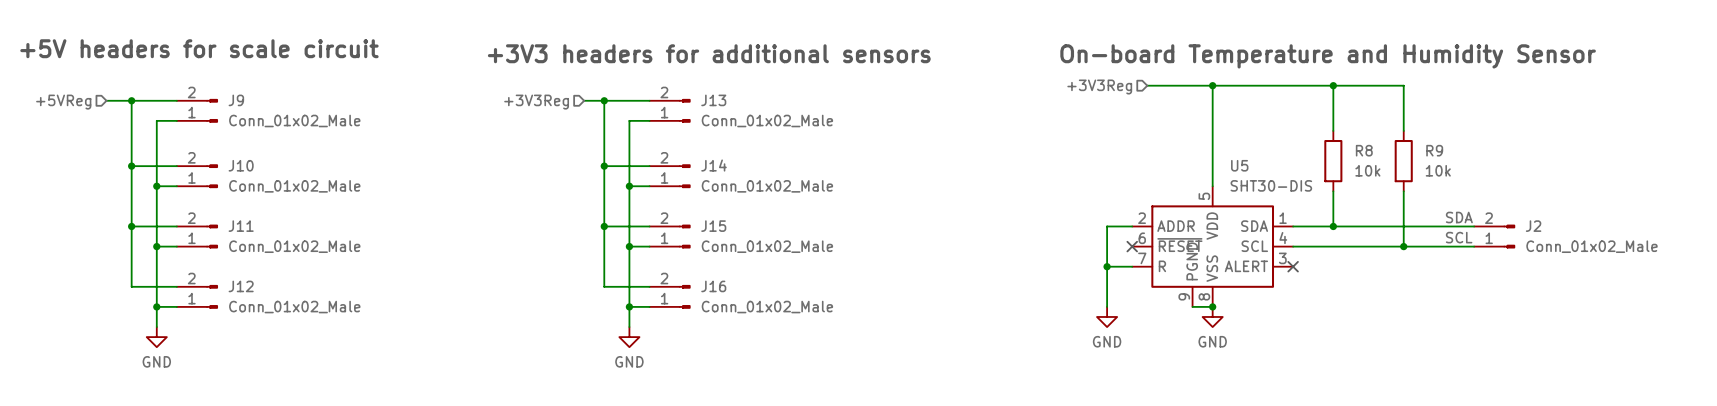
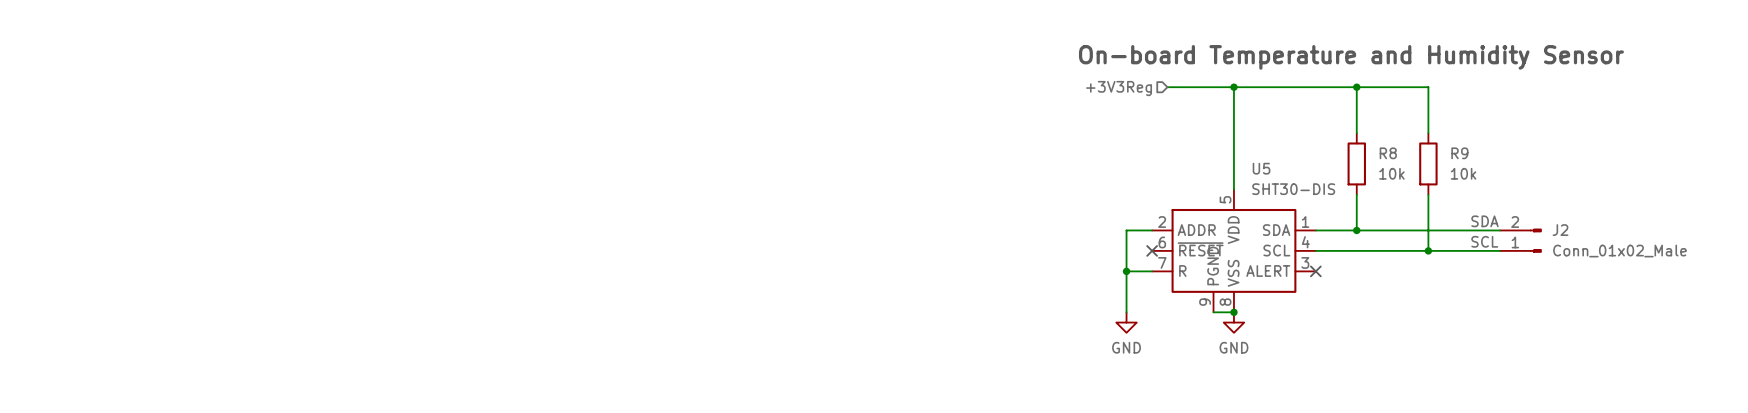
text: +5V headers for scale circuit (199, 48) -> none
text: +3V3 headers for additional sensors (709, 53) -> none
wire: (106, 100) (176, 100) -> none
wire: (131, 100) (131, 286) (176, 286) -> none
junction: (131, 100) -> none
wire: (584, 100) (649, 100) -> none
wire: (604, 100) (604, 286) (649, 286) -> none
junction: (604, 100) -> none
hierarchical label: +5VReg (63, 102) -> none
hierarchical label: +3V3Reg (536, 102) -> none
J9: Conn_01x02_Male (197, 110) -> none
J13: Conn_01x02_Male (669, 110) -> none
wire: (176, 120) (156, 120) (156, 327) -> none
wire: (649, 120) (629, 120) (629, 327) -> none
wire: (131, 166) (176, 166) -> none
junction: (131, 166) -> none
wire: (604, 166) (649, 166) -> none
junction: (604, 166) -> none
J10: Conn_01x02_Male (197, 176) -> none
J14: Conn_01x02_Male (669, 176) -> none
wire: (156, 186) (176, 186) -> none
junction: (156, 186) -> none
wire: (629, 186) (649, 186) -> none
junction: (629, 186) -> none
wire: (131, 226) (176, 226) -> none
junction: (131, 226) -> none
wire: (604, 226) (649, 226) -> none
junction: (604, 226) -> none
J11: Conn_01x02_Male (197, 236) -> none
J15: Conn_01x02_Male (669, 236) -> none
wire: (156, 246) (176, 246) -> none
junction: (156, 246) -> none
wire: (629, 246) (649, 246) -> none
junction: (629, 246) -> none
J12: Conn_01x02_Male (197, 296) -> none
J16: Conn_01x02_Male (669, 296) -> none
wire: (156, 306) (176, 306) -> none
junction: (156, 306) -> none
wire: (629, 306) (649, 306) -> none
junction: (629, 306) -> none
power symbol: GND (156, 337) -> none
power symbol: GND (629, 337) -> none

